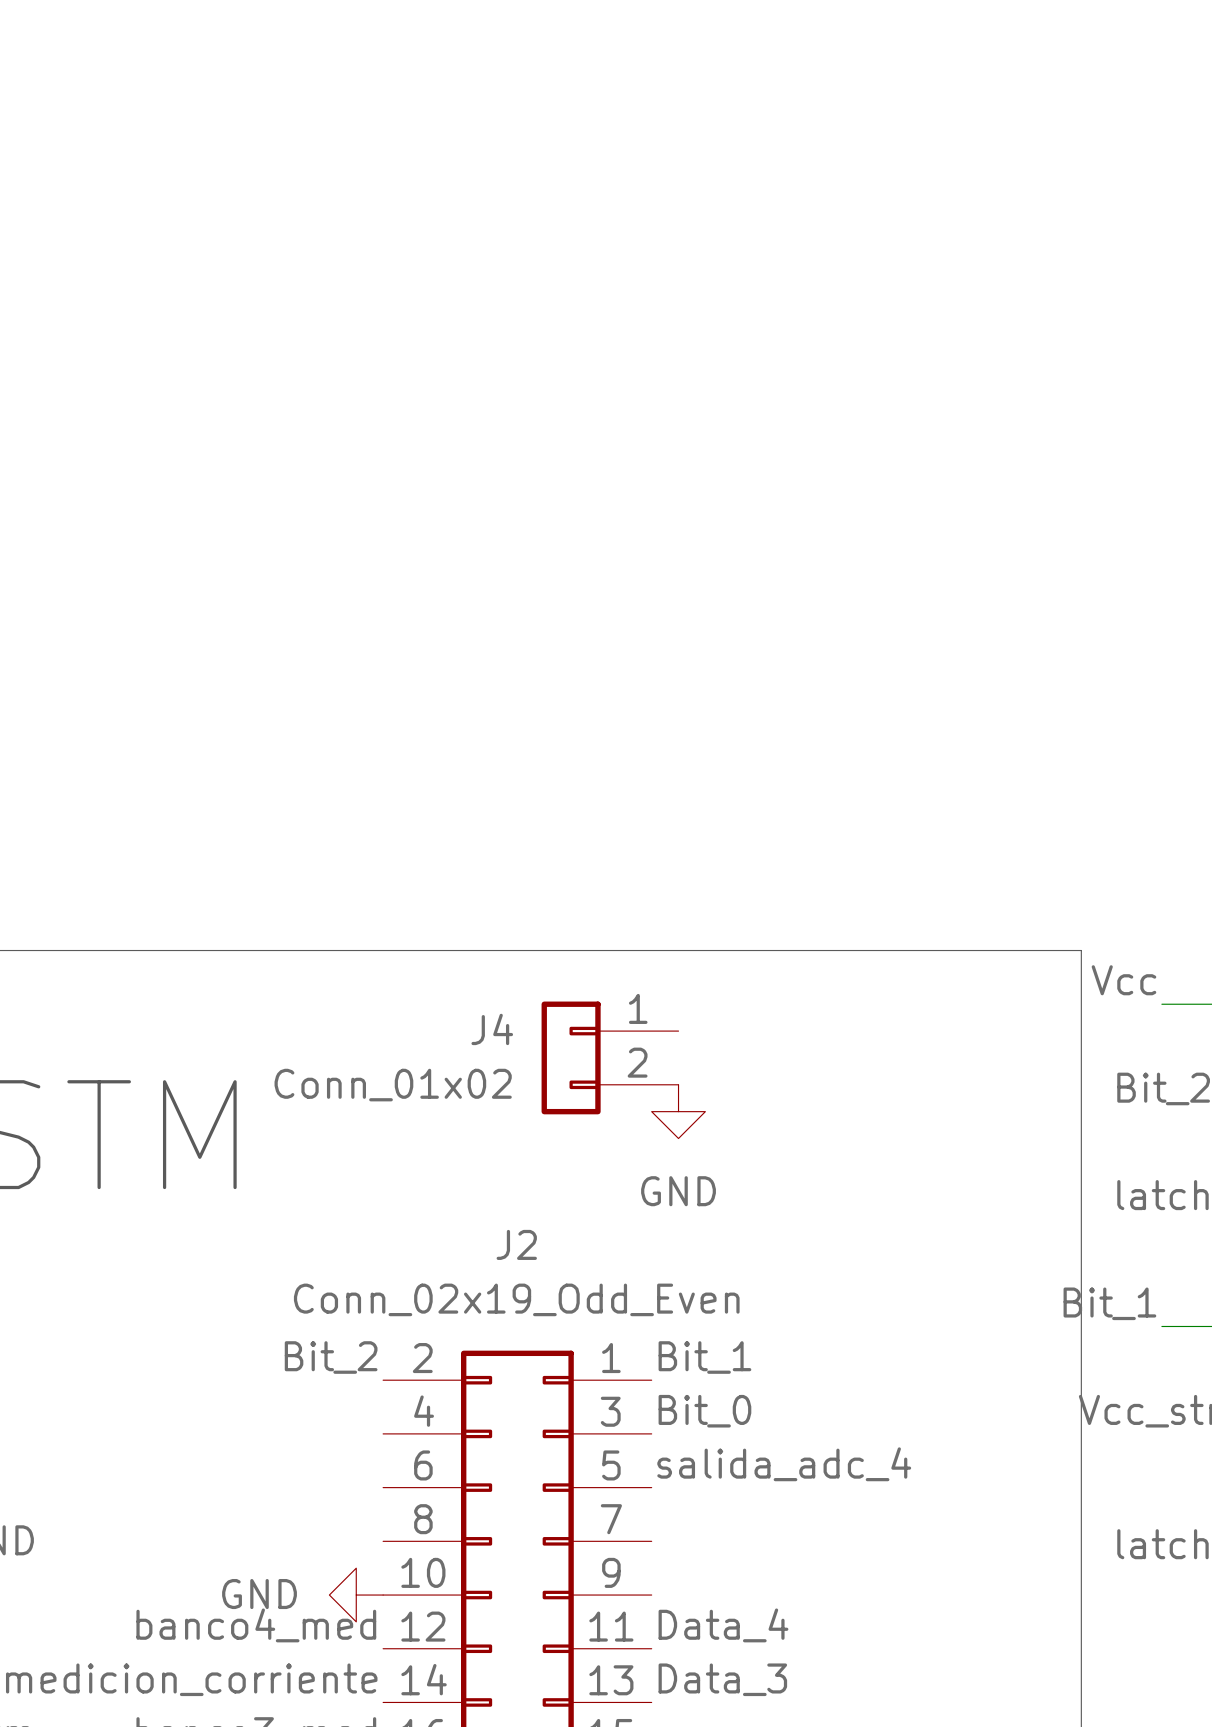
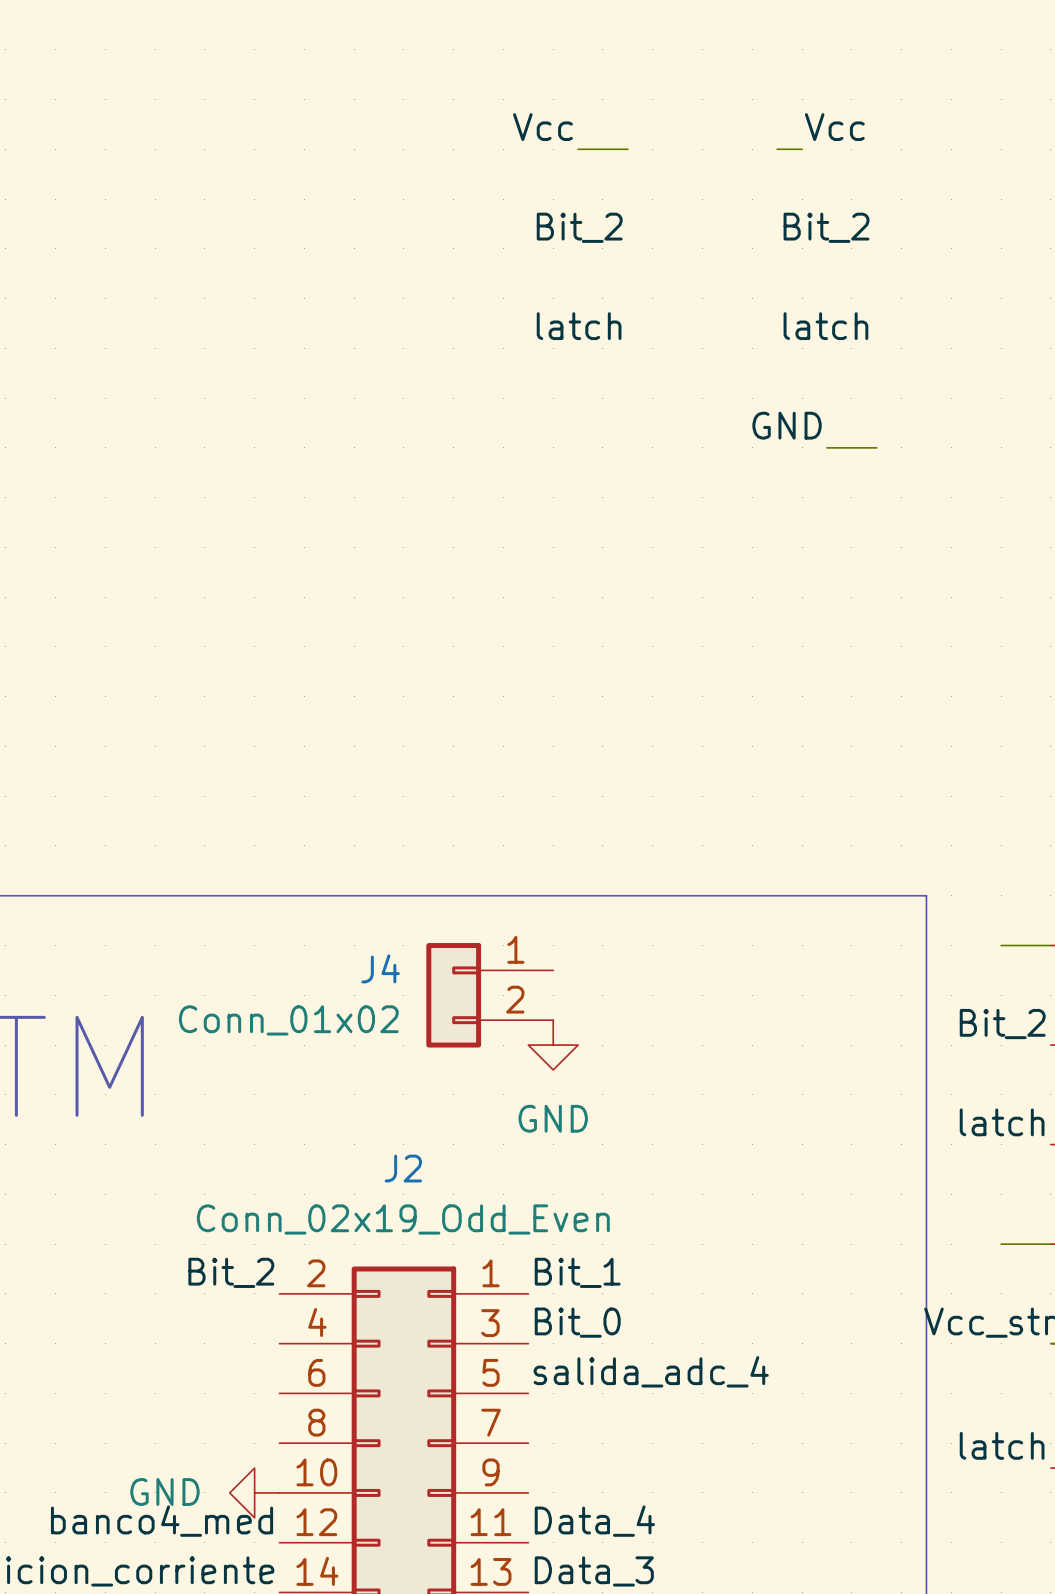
label: none -> Vcc (542, 127)
label: none -> Vcc (834, 127)
wire: none -> (578, 149) (627, 149)
wire: none -> (777, 149) (802, 149)
label: none -> Bit_2 (579, 227)
label: none -> Bit_2 (826, 227)
label: none -> latch (579, 326)
label: none -> latch (825, 326)
label: none -> GND (787, 425)
wire: none -> (826, 447) (876, 447)
label: Vcc (1123, 980) -> none
label: Bit_1 (1109, 1303) -> none

